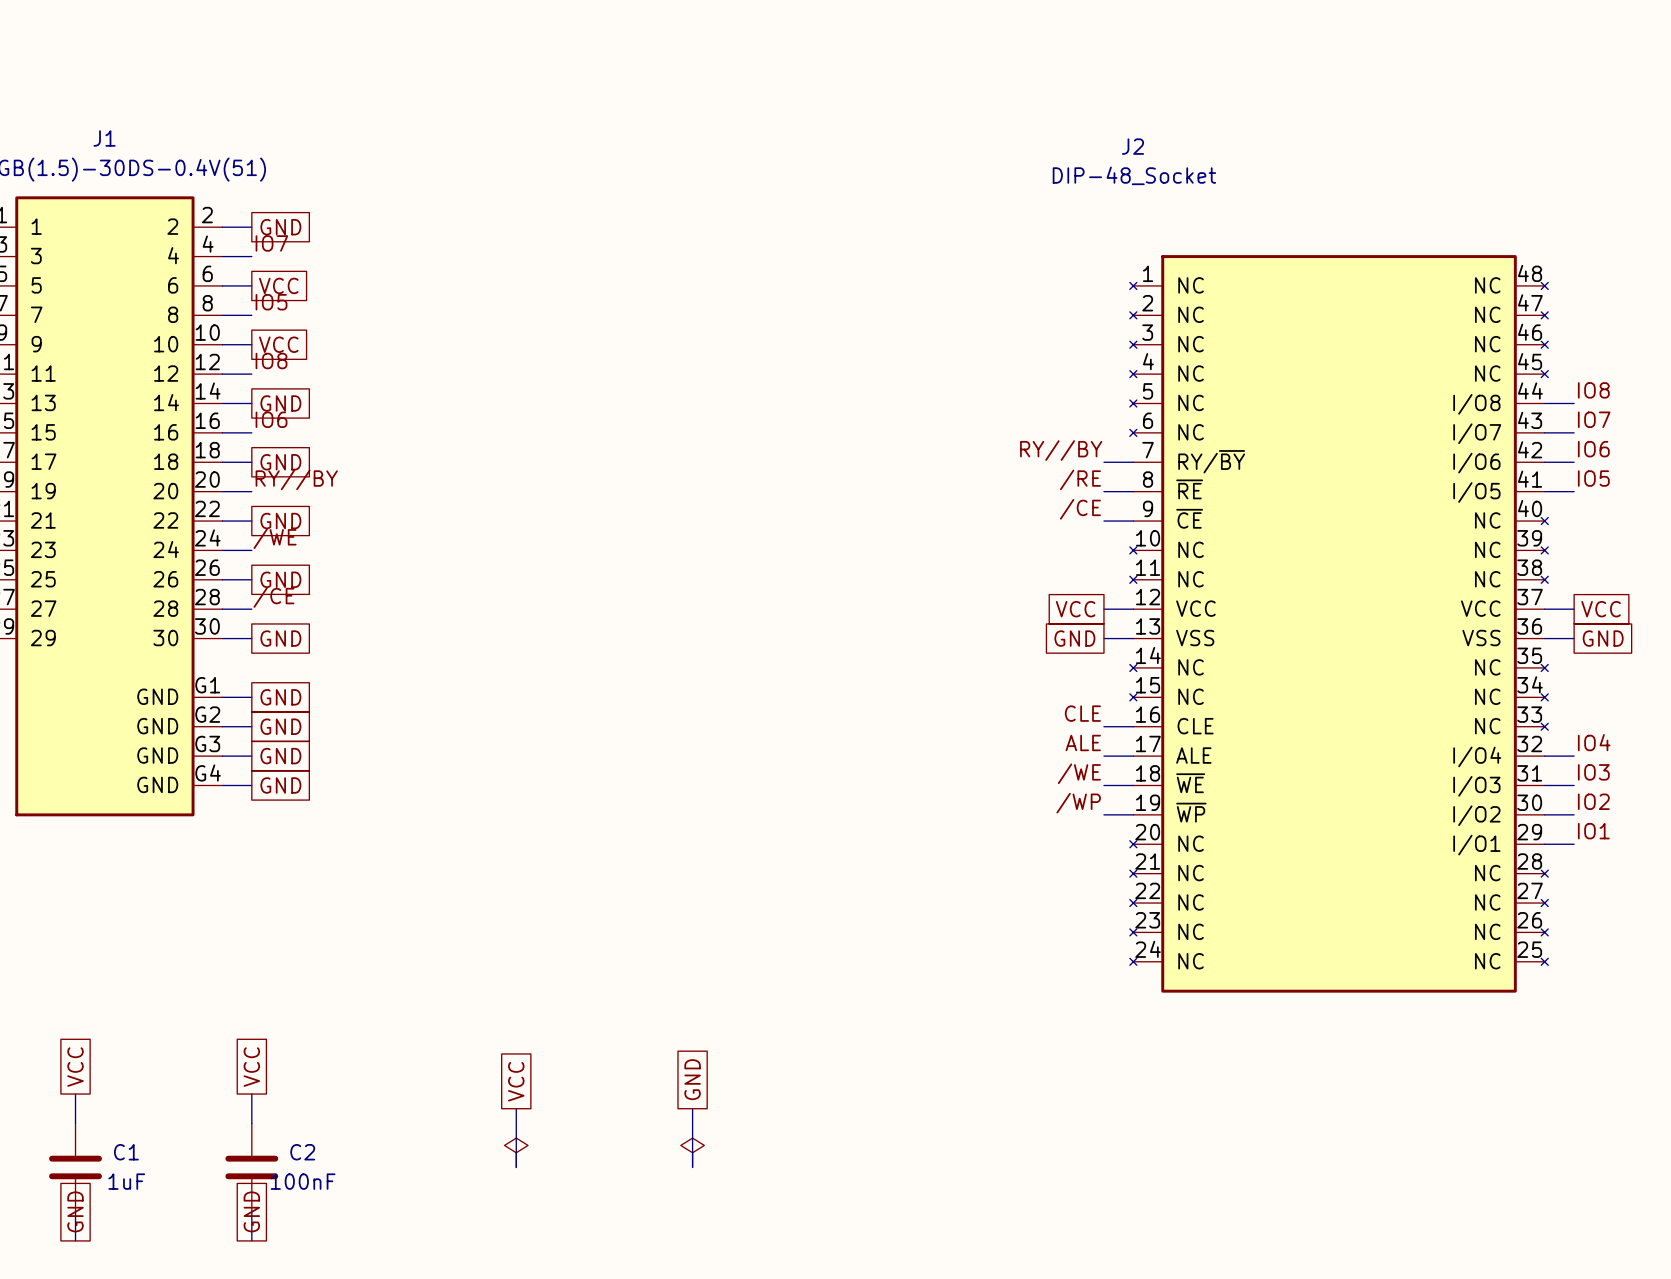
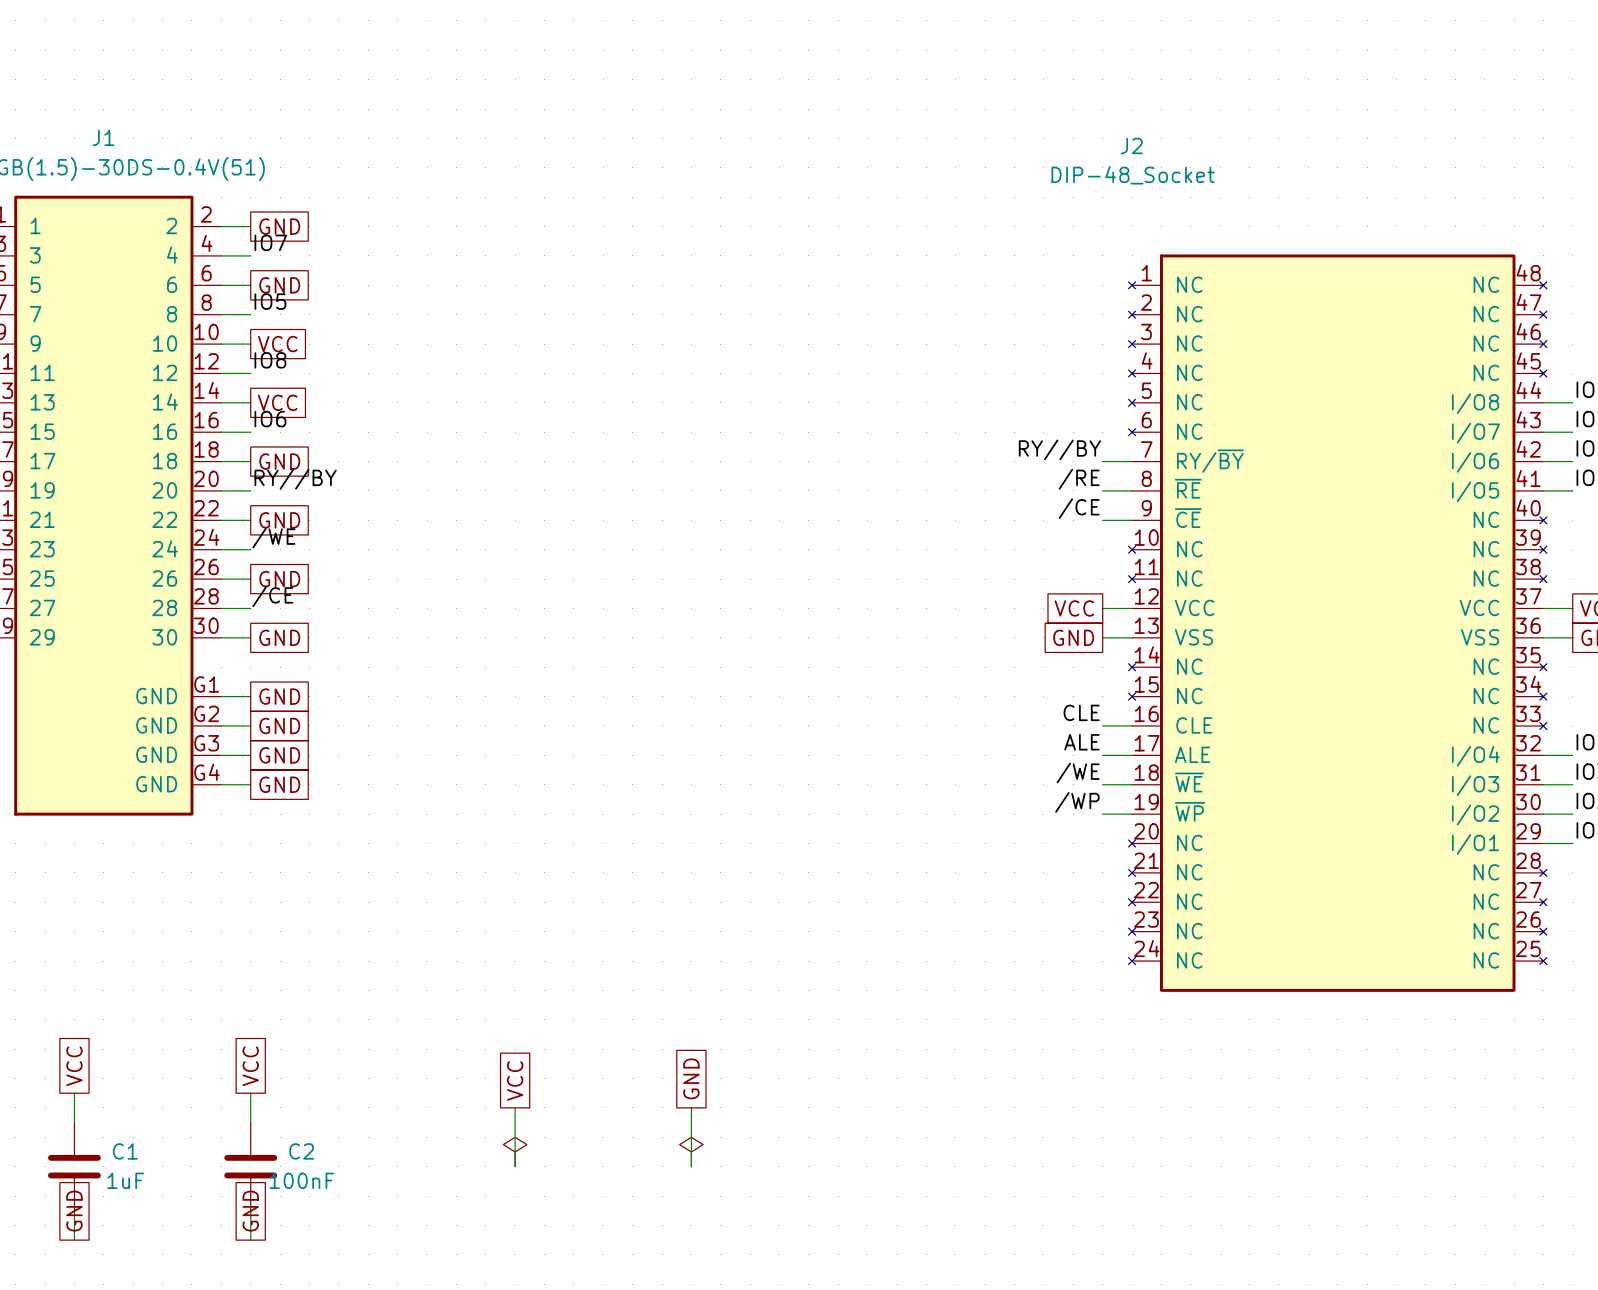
global label: VCC (278, 285) -> GND (279, 285)
global label: GND (280, 403) -> VCC (277, 402)

